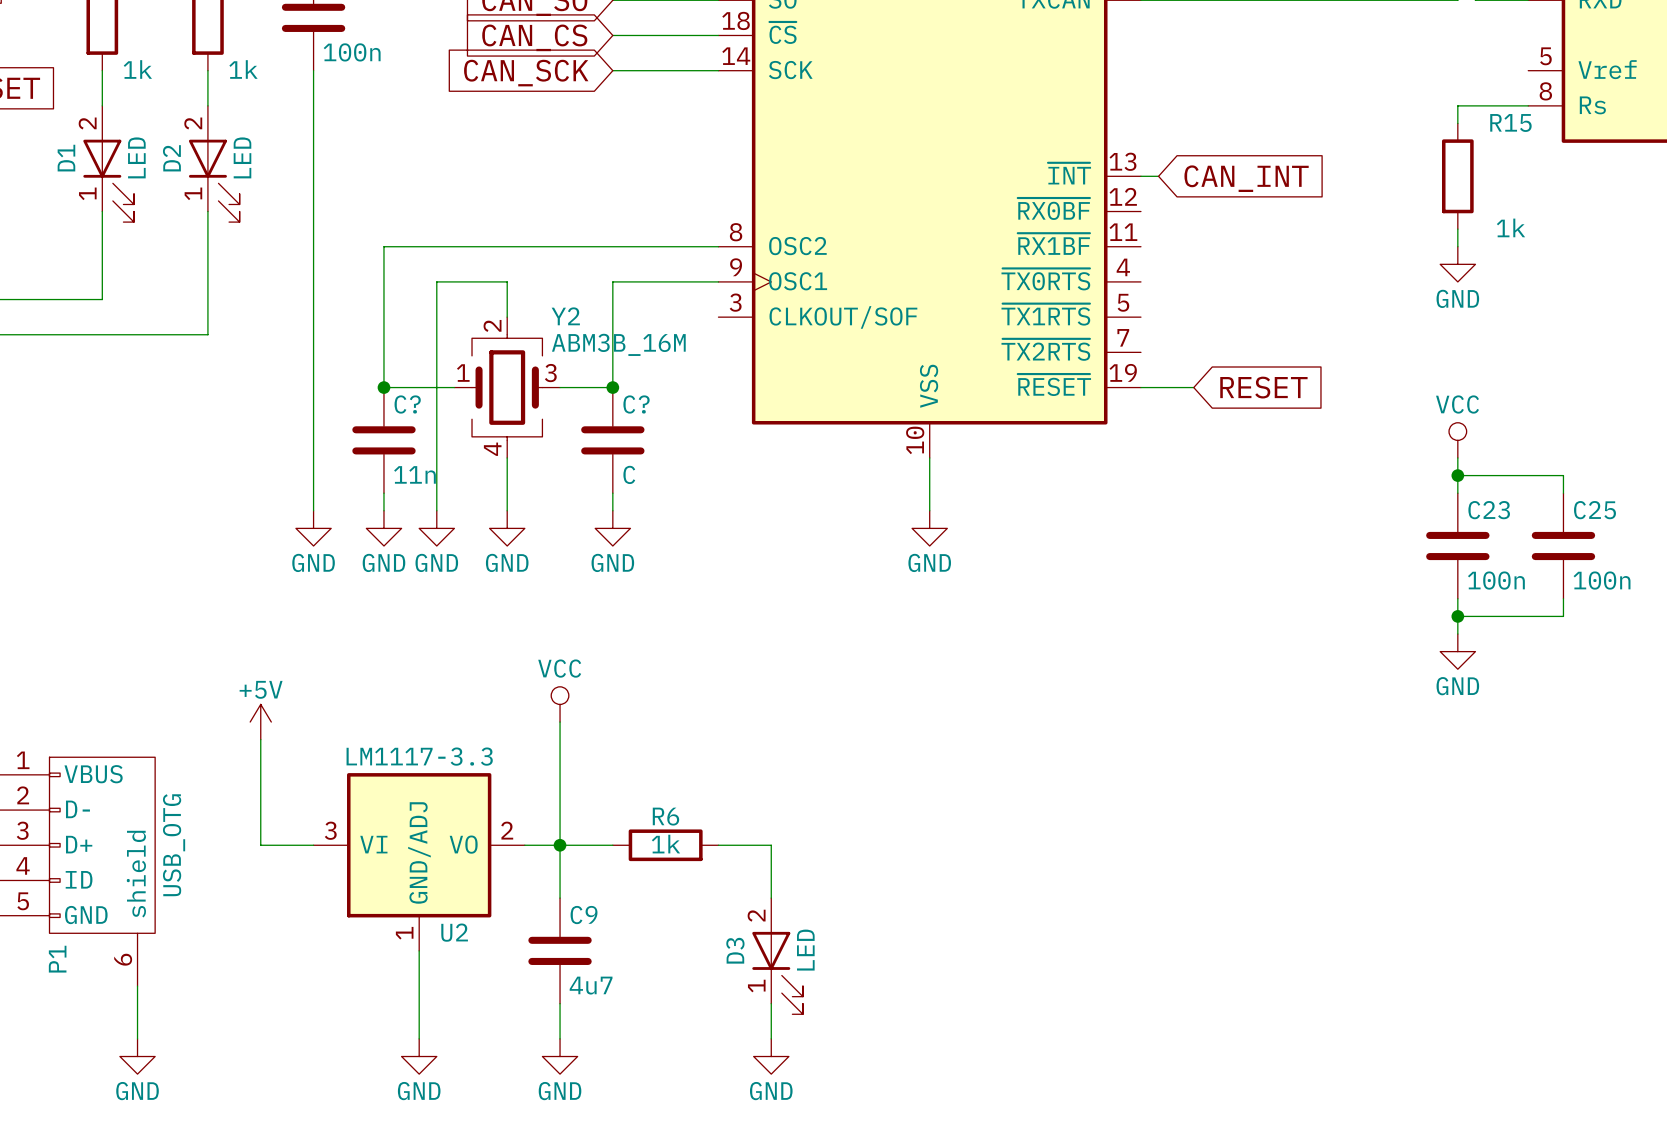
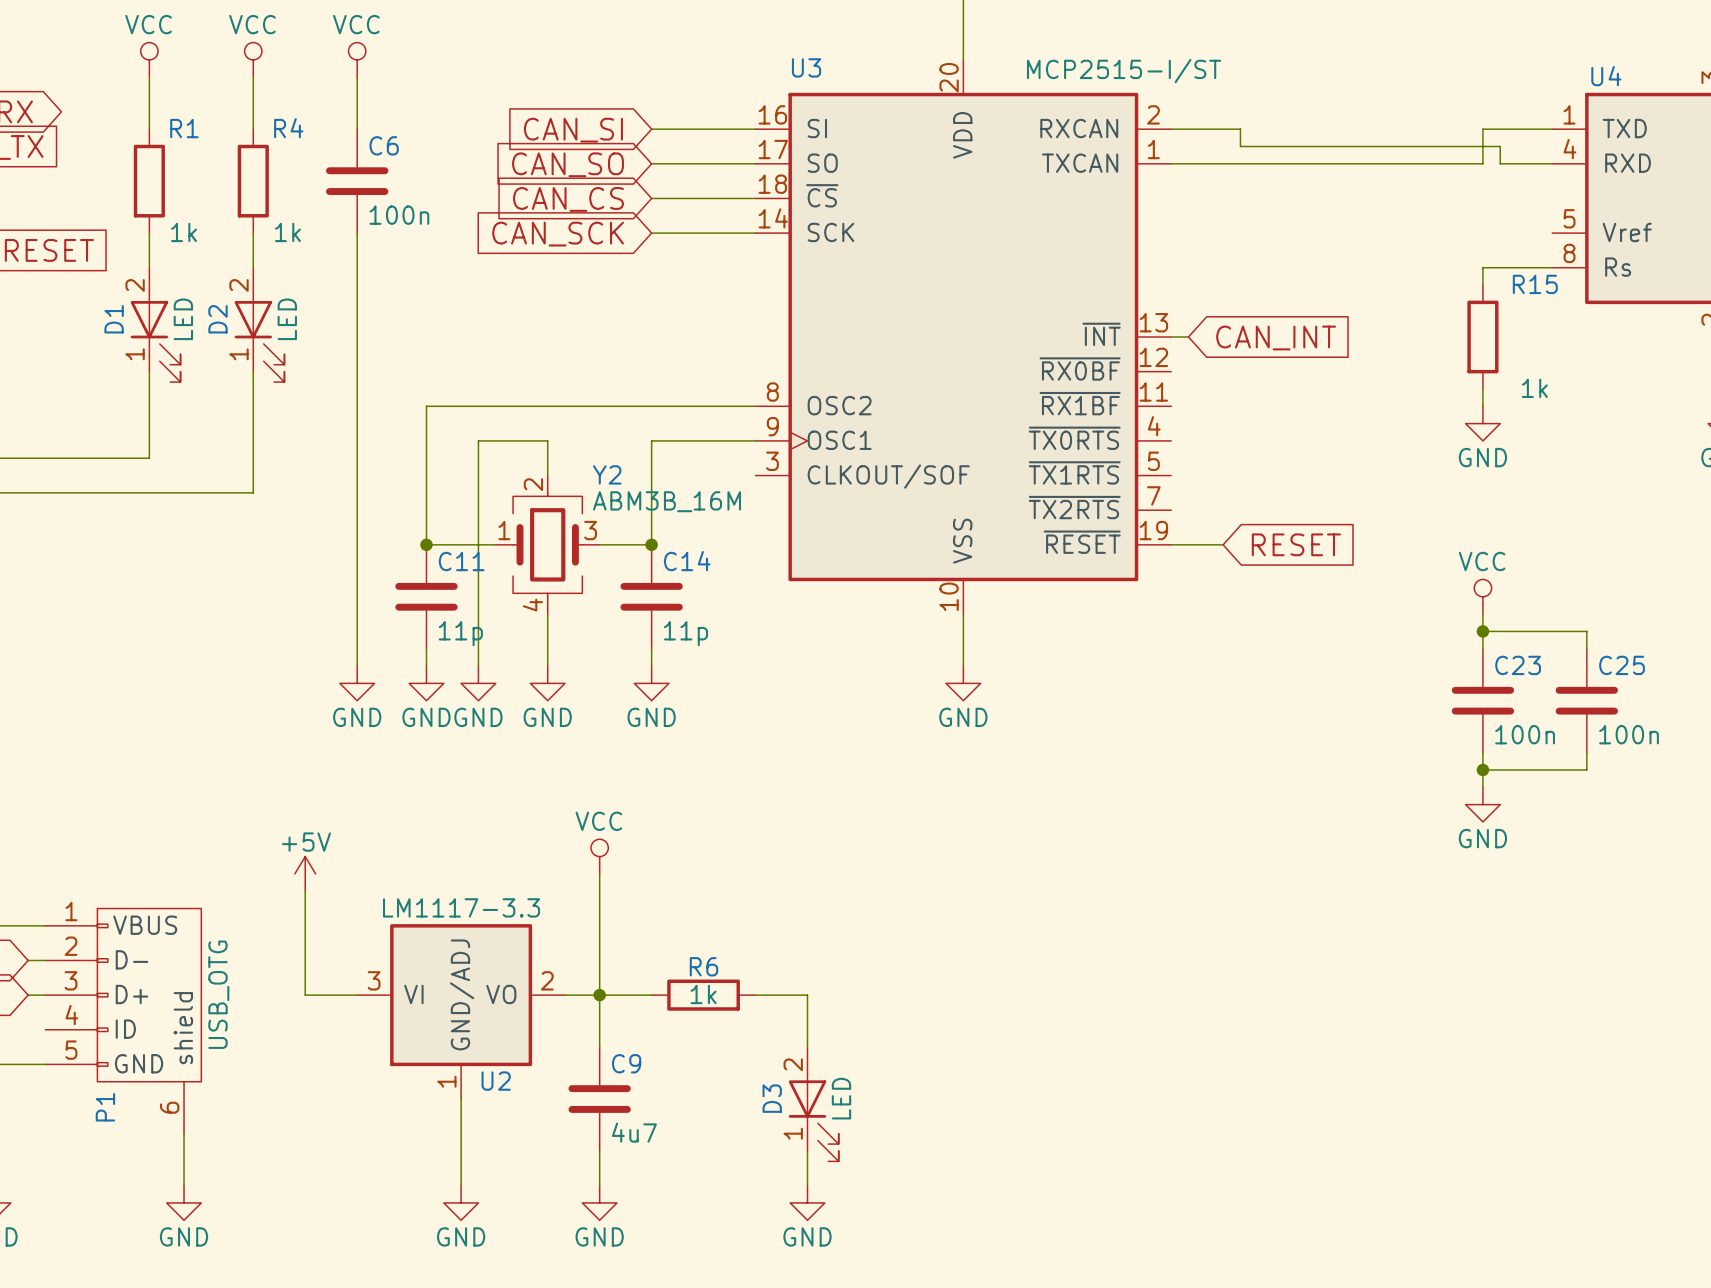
C? name: C? (407, 404) -> C11 (461, 561)
C? name: C? (636, 404) -> C14 (687, 561)
C? value: 11n (414, 474) -> 11p (460, 633)
C? value: C (629, 474) -> 11p (685, 633)

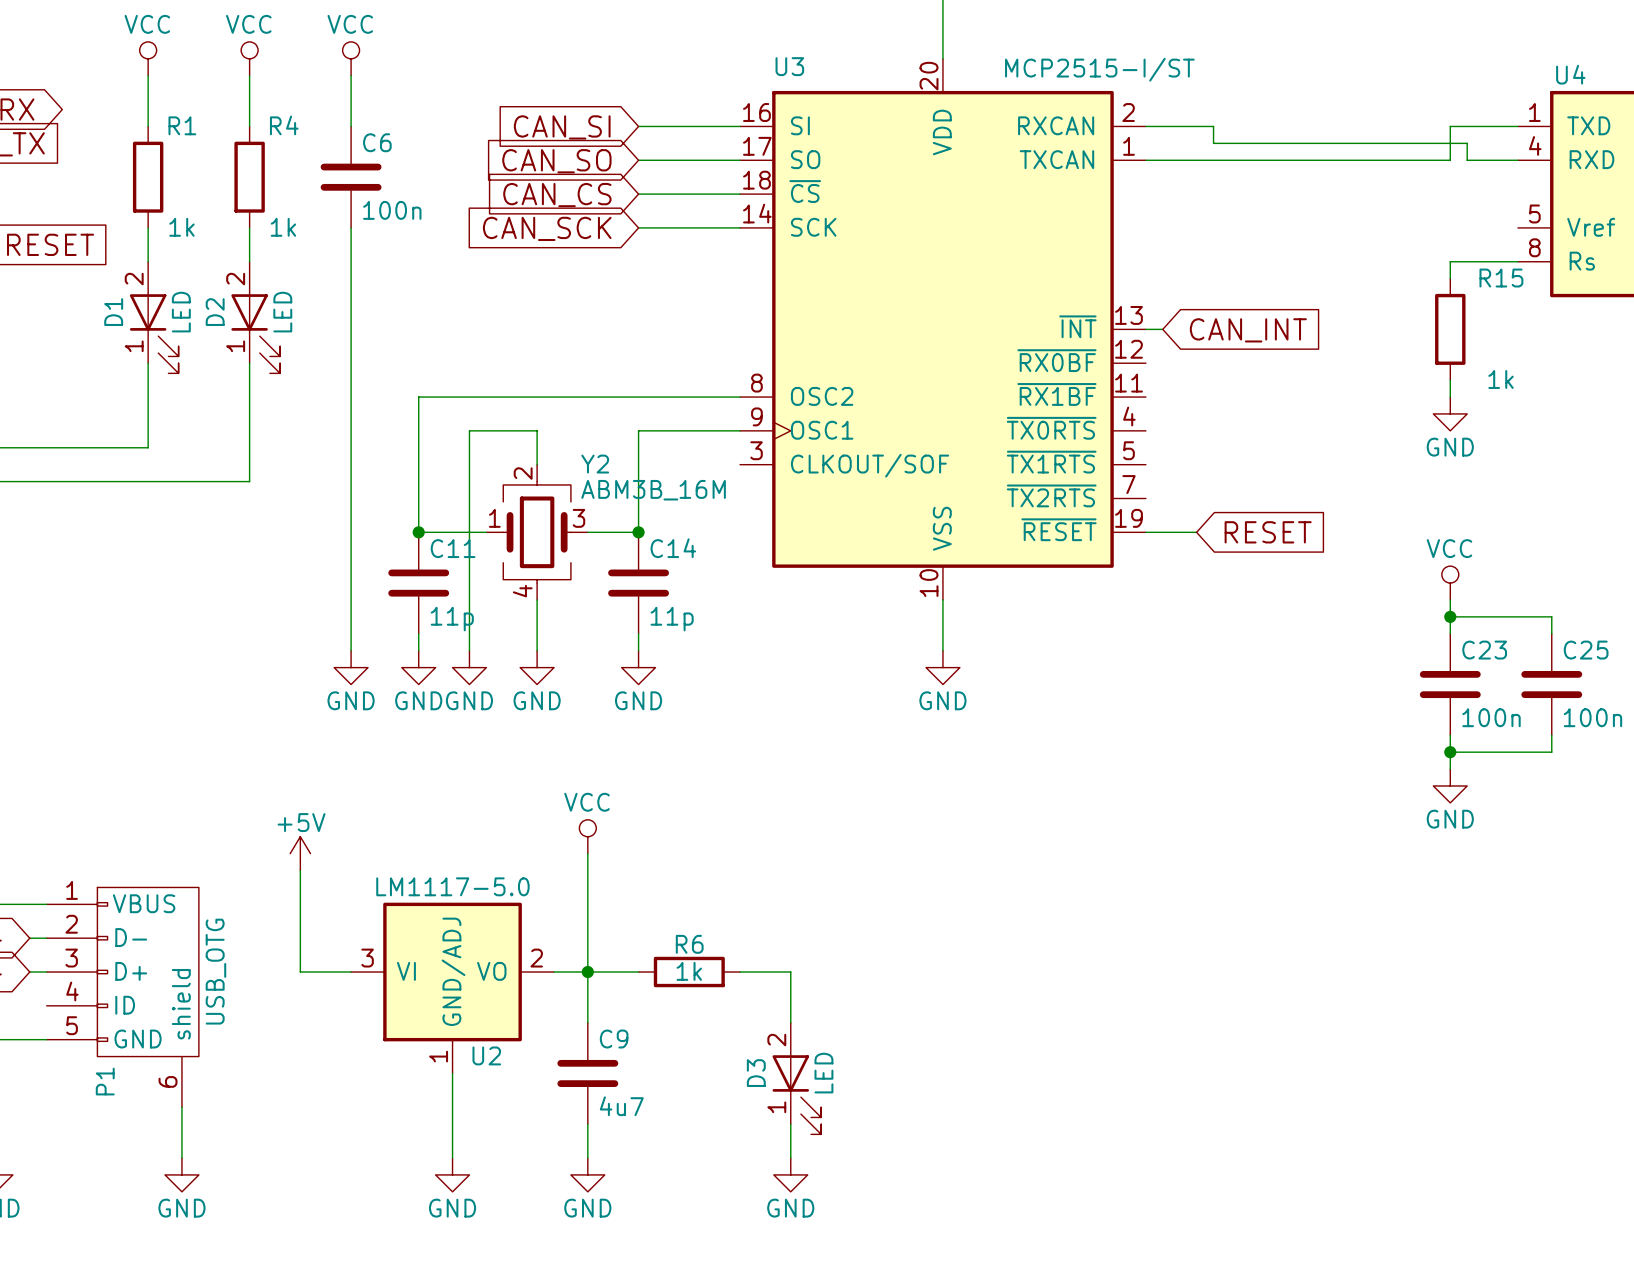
U2 value: LM1117-3.3 (461, 907) -> LM1117-5.0 (452, 886)

